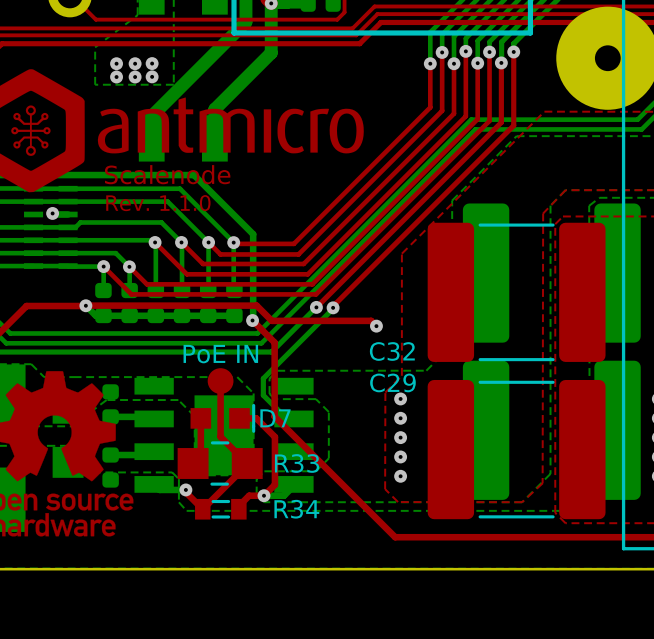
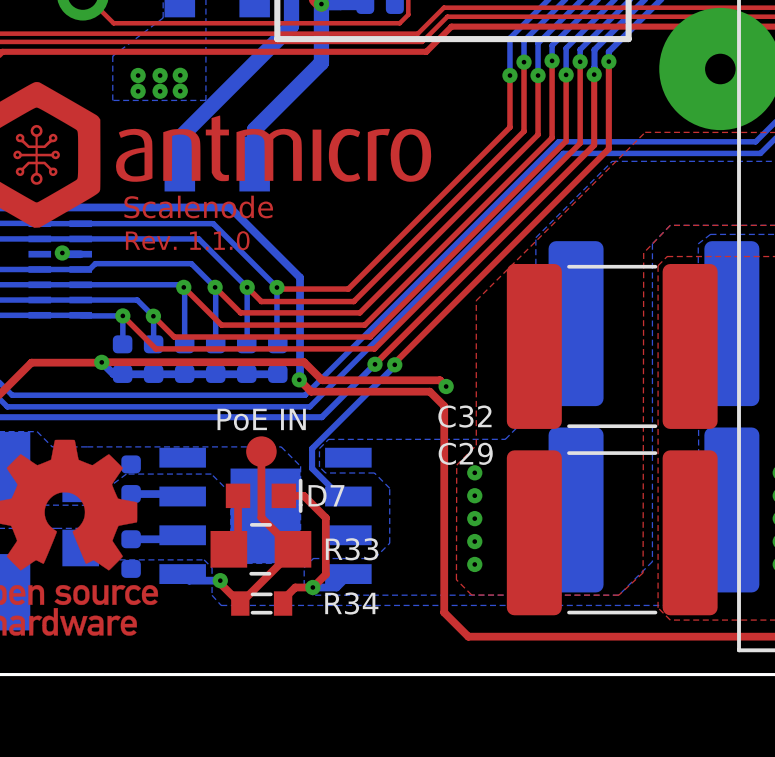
top track: (262, 330) (274, 342) (274, 416) (374, 516) -> (311, 391) (429, 391) (444, 406) (444, 612)

